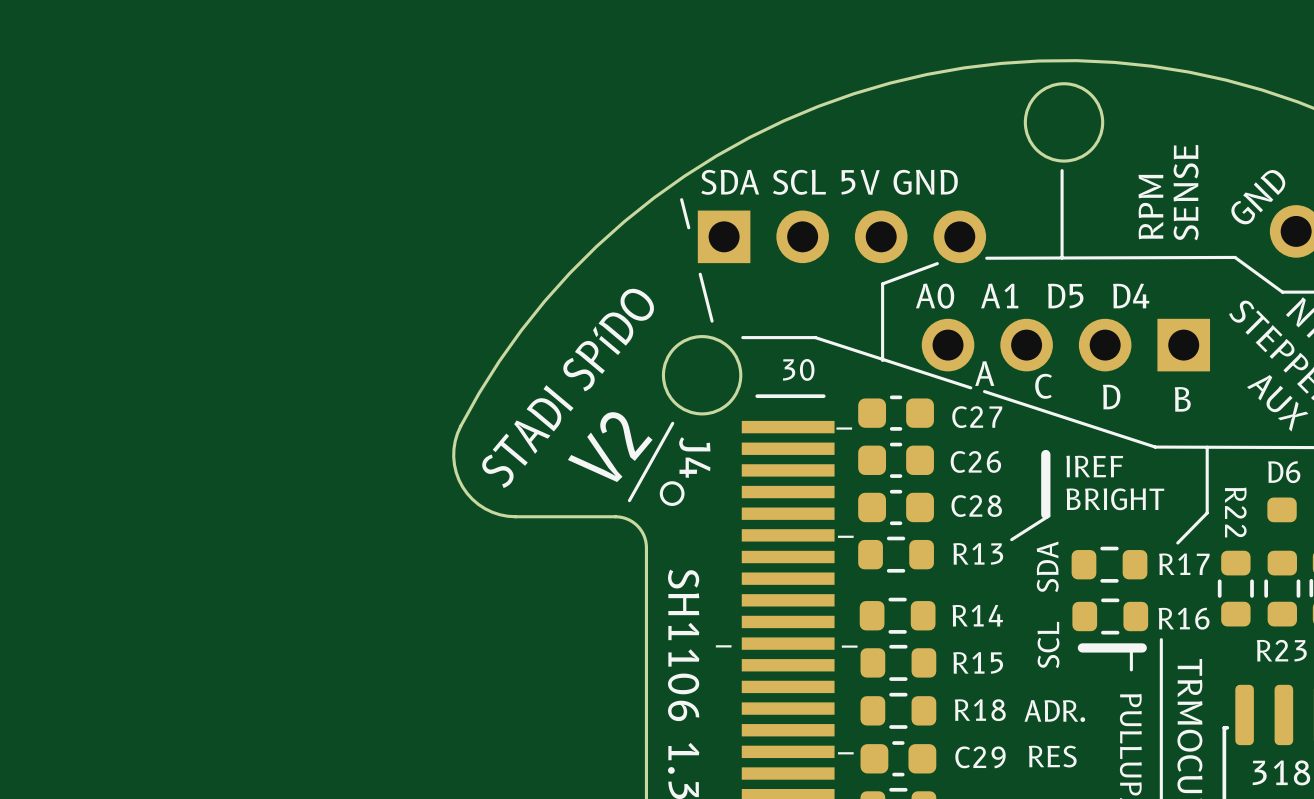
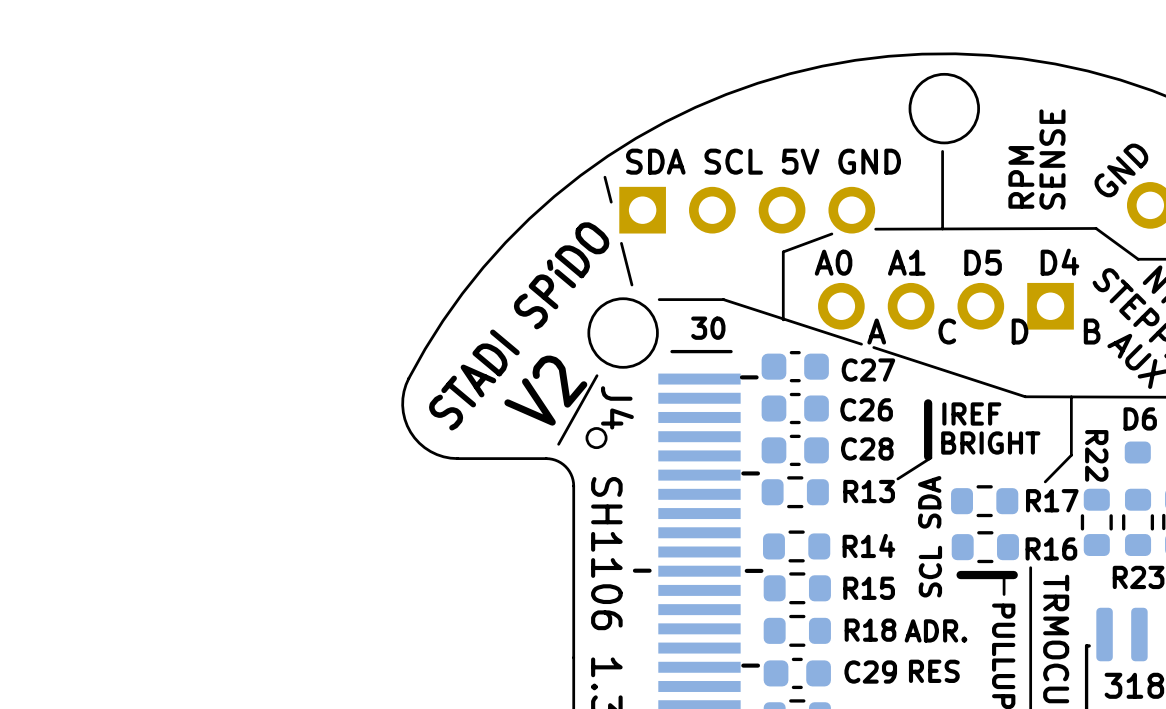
text: A (984, 373) -> A C D B (983, 331)
text: C (1043, 386) -> none
text: D (1111, 397) -> none
text: B (1182, 399) -> none

